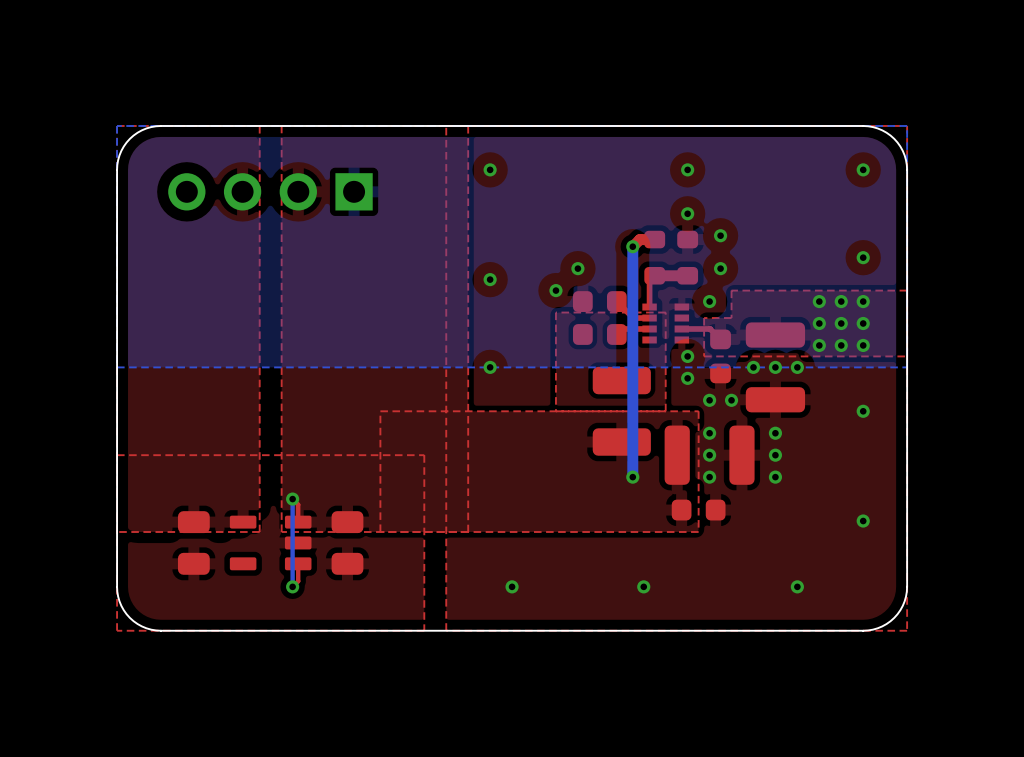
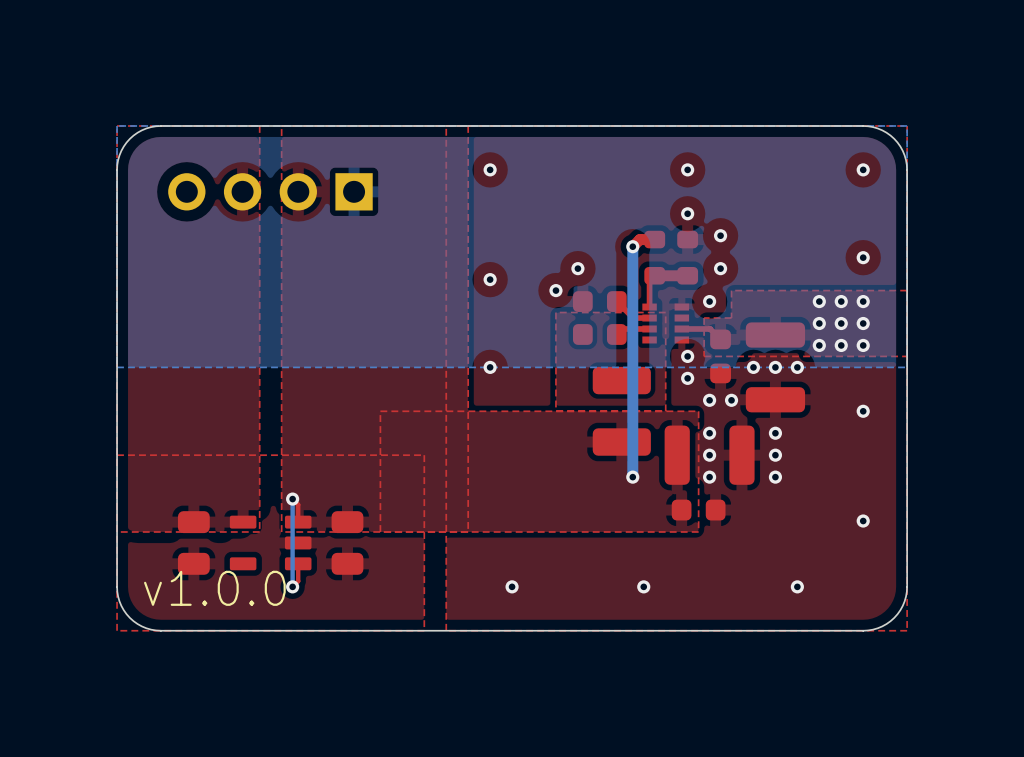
text: none -> v1.0.0 (214, 588)

